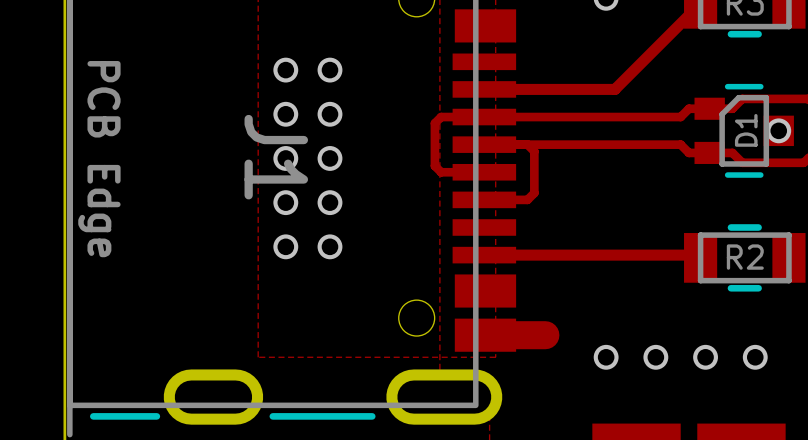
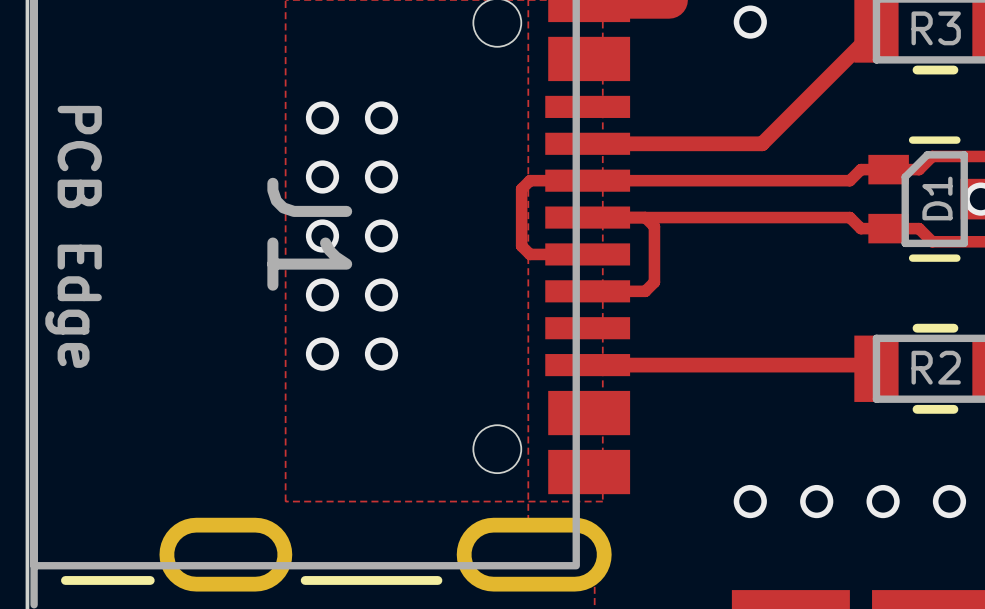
top track: (485, 335) (545, 335) -> none

